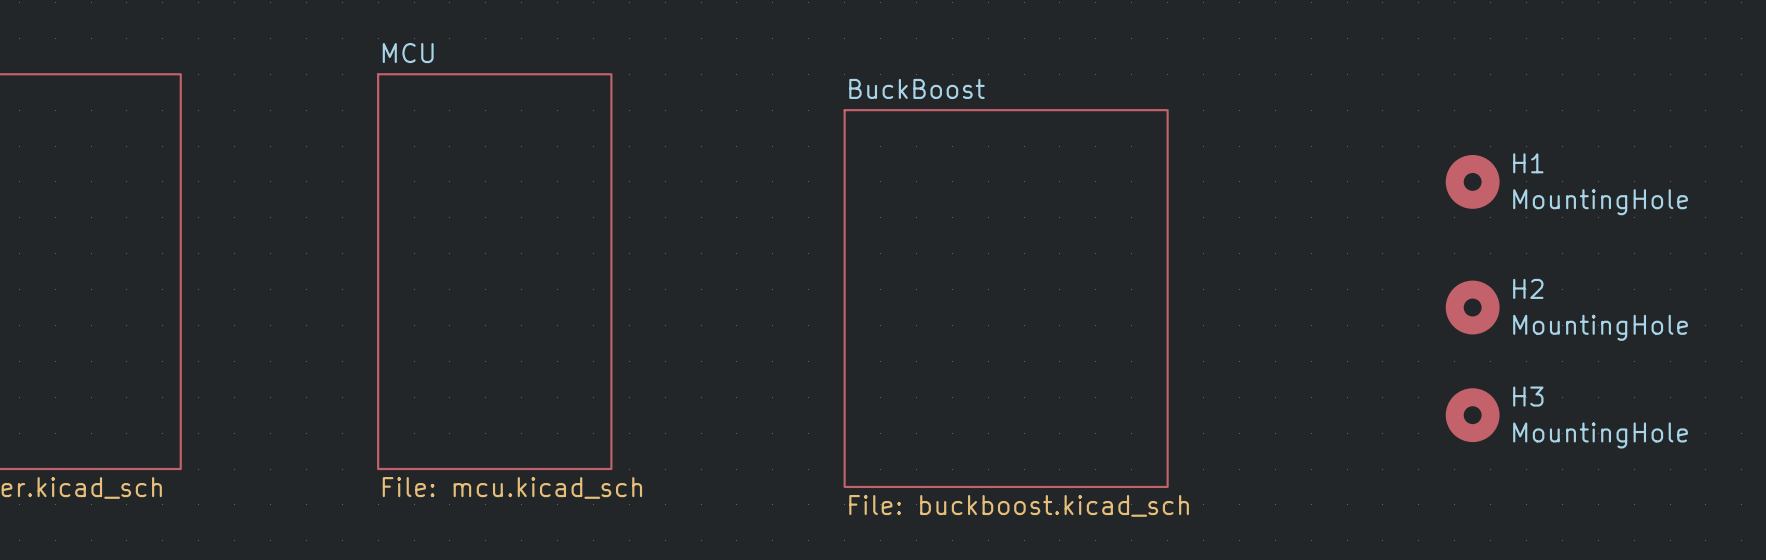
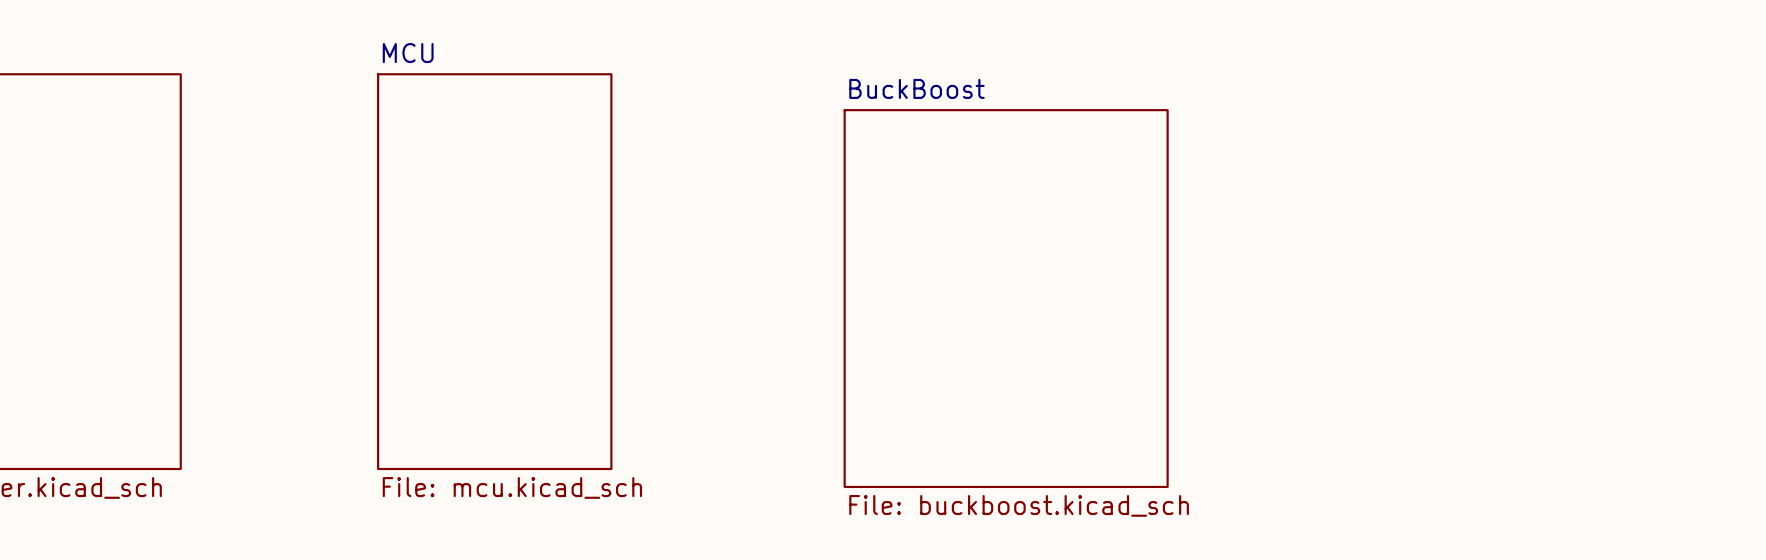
H1: MountingHole (1472, 181) -> none
H2: MountingHole (1472, 307) -> none
H3: MountingHole (1472, 415) -> none

